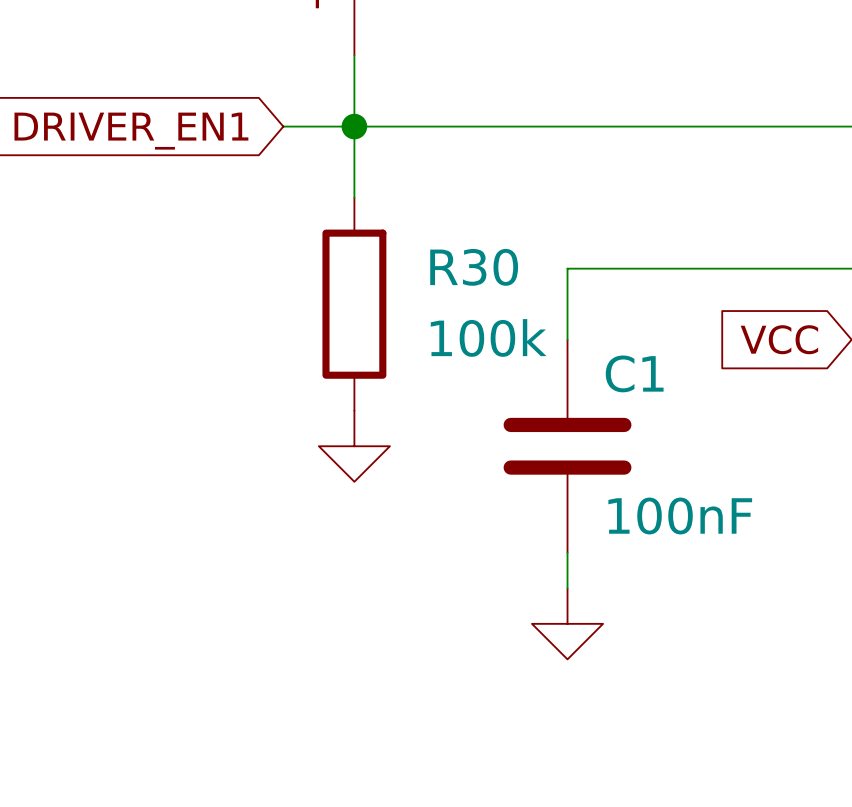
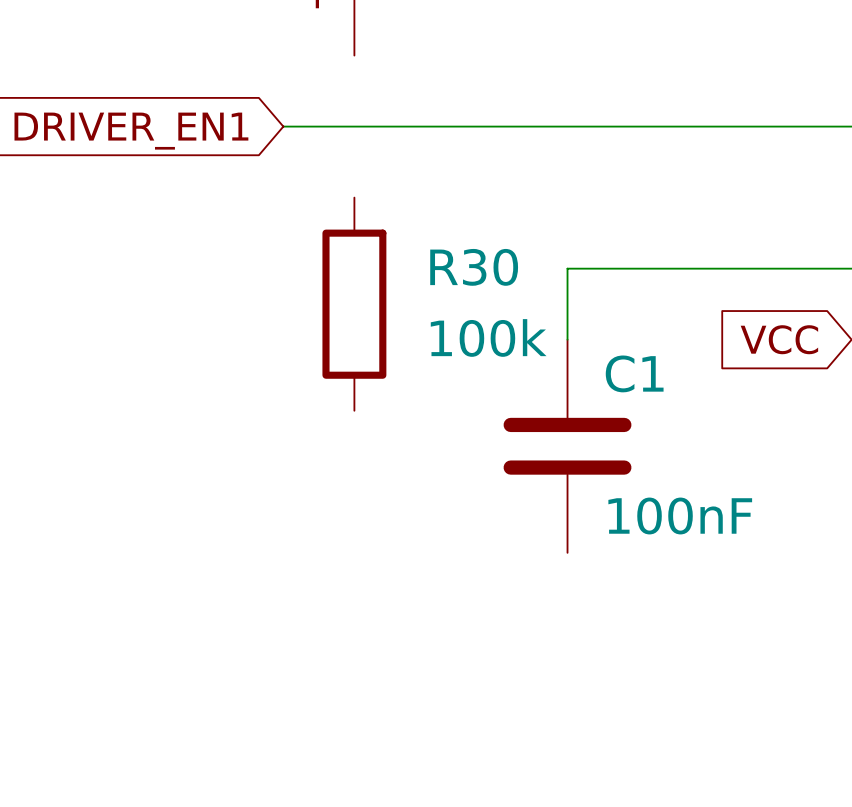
wire: (354, 55) (354, 197) -> none
junction: (354, 126) -> none
power symbol: (354, 446) -> none
wire: (567, 552) (567, 588) -> none
power symbol: (567, 623) -> none

